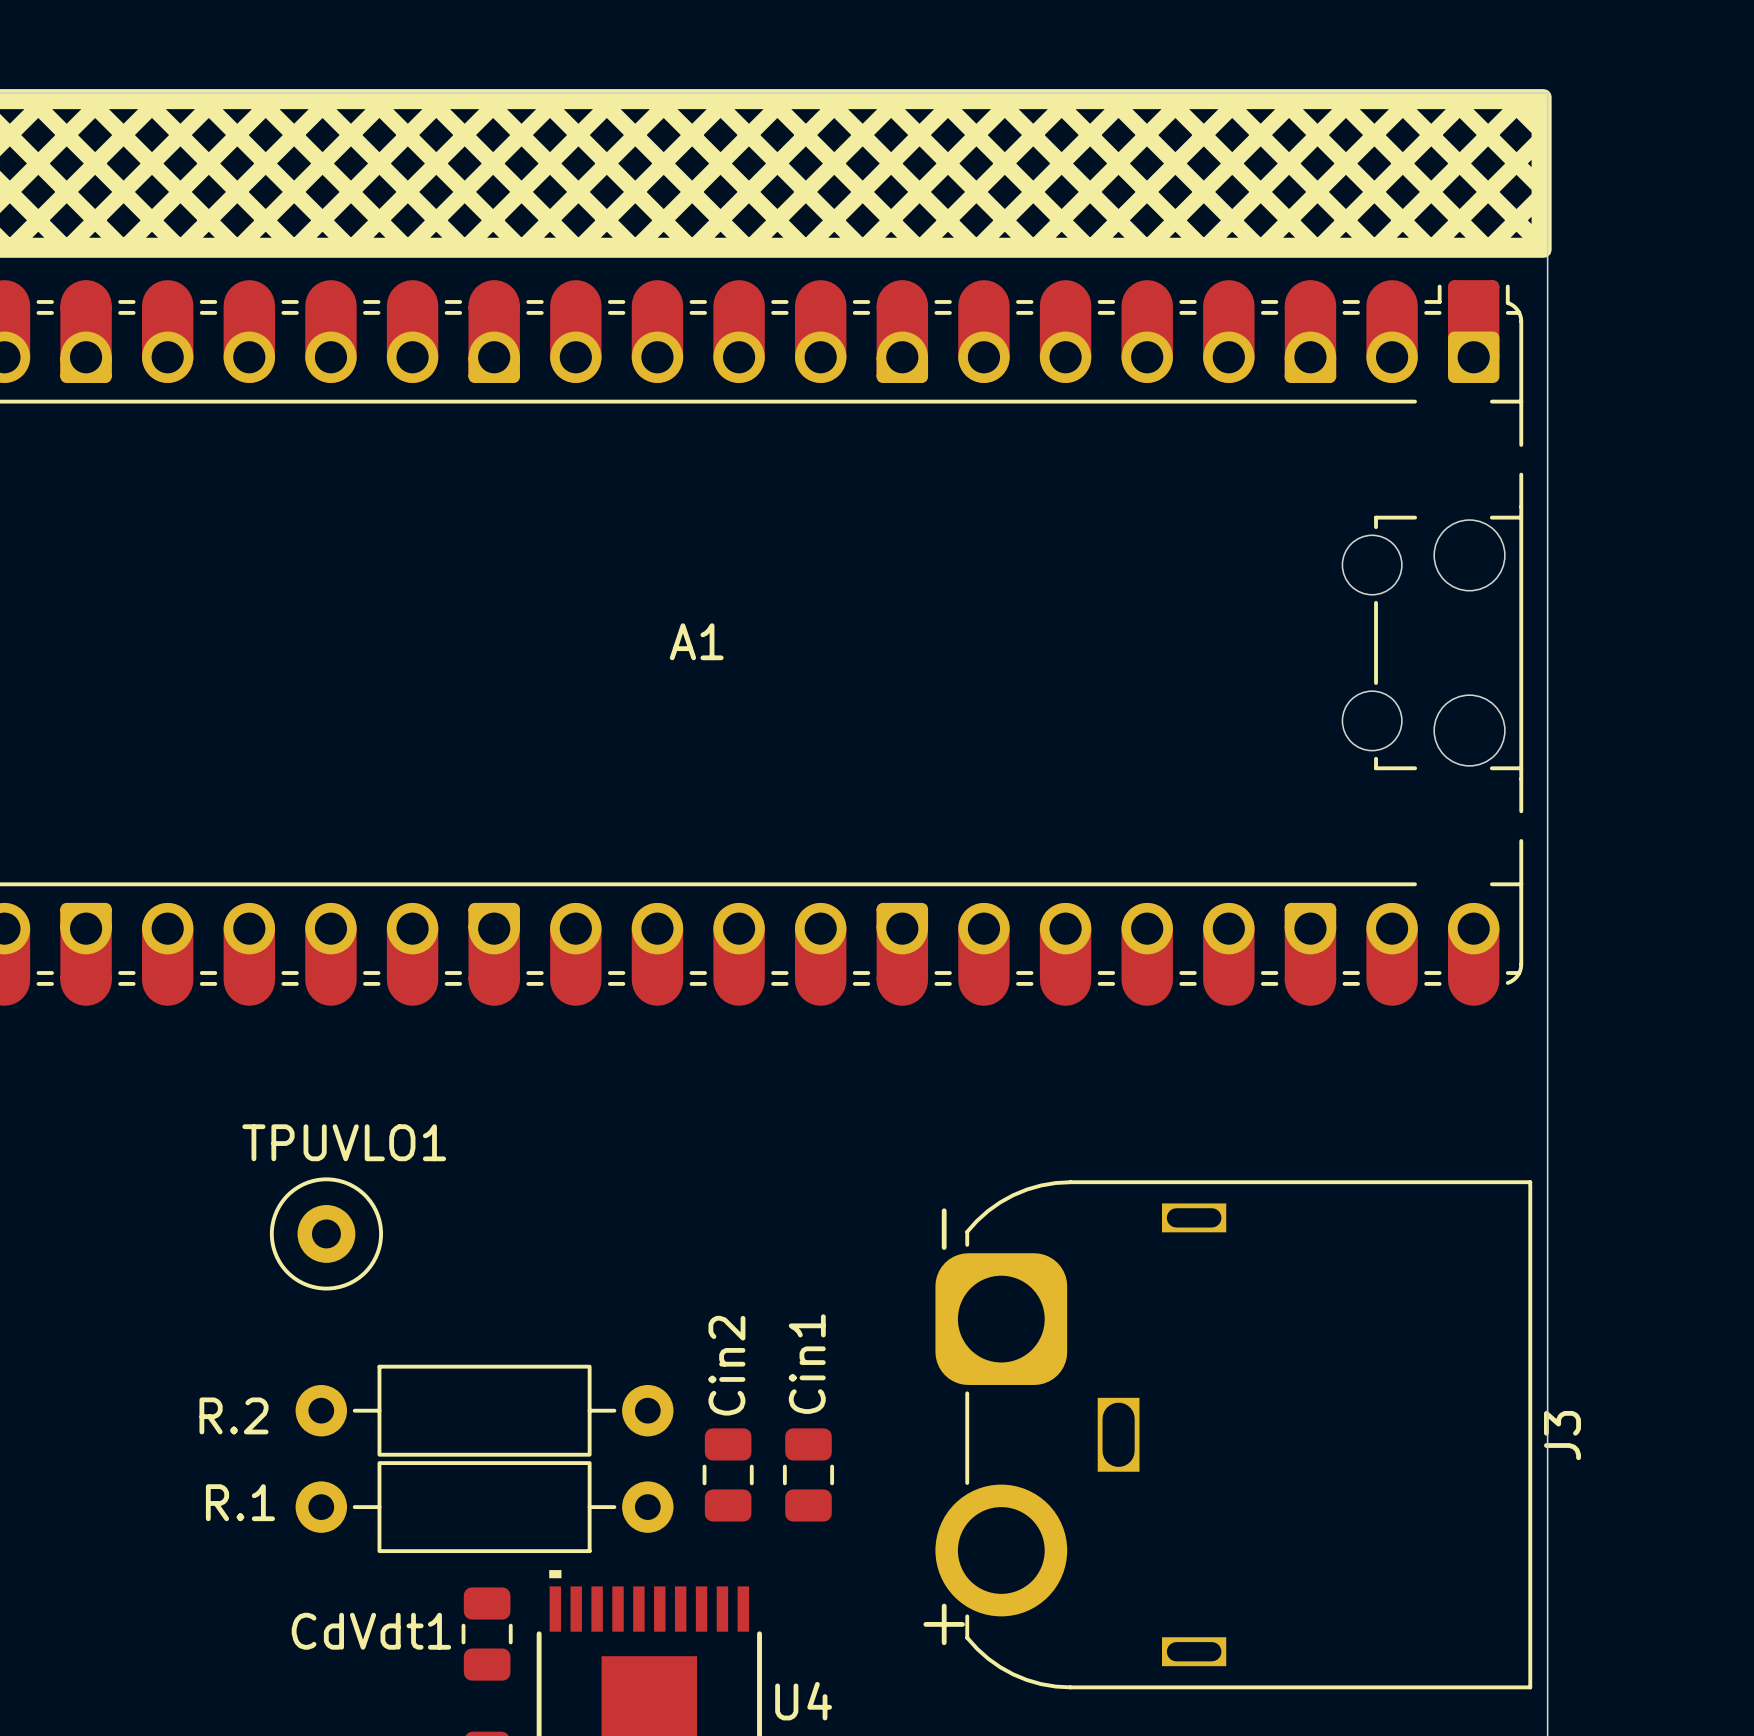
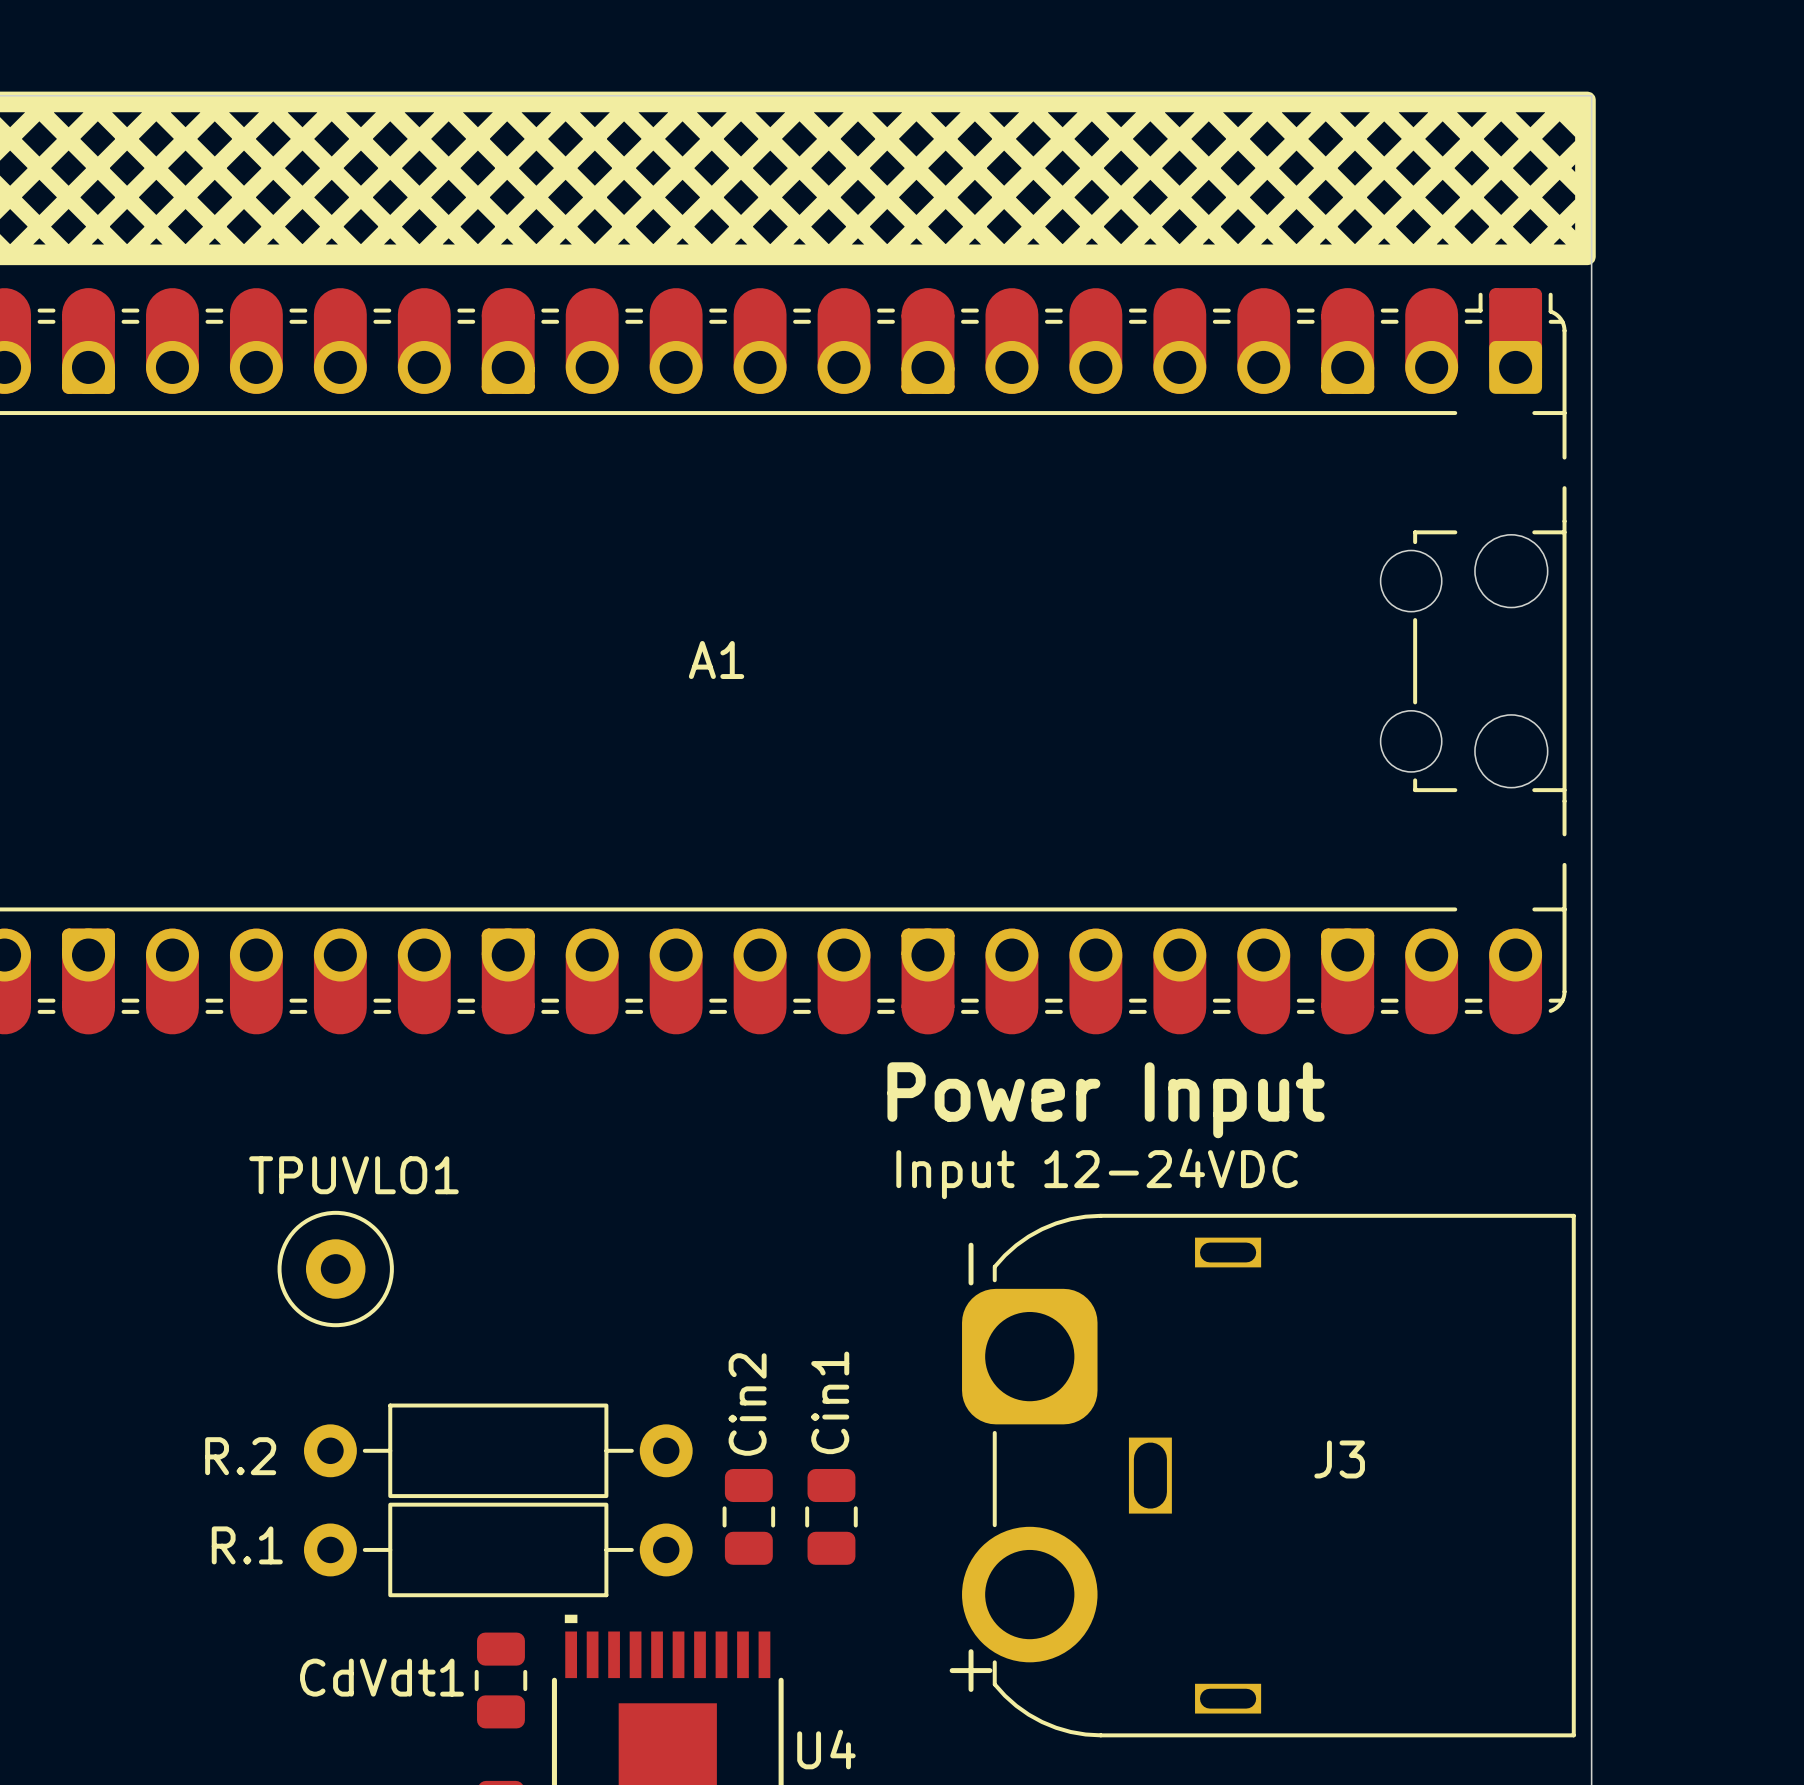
J3 value: none -> Power Input (1106, 1100)
text: none -> Input 12-24VDC (1097, 1173)
J3 name rotation: 0° (1562, 1435) -> 90° clockwise (1339, 1459)
J3 name position: J3 (1562, 1435) -> J3 (1339, 1459)

